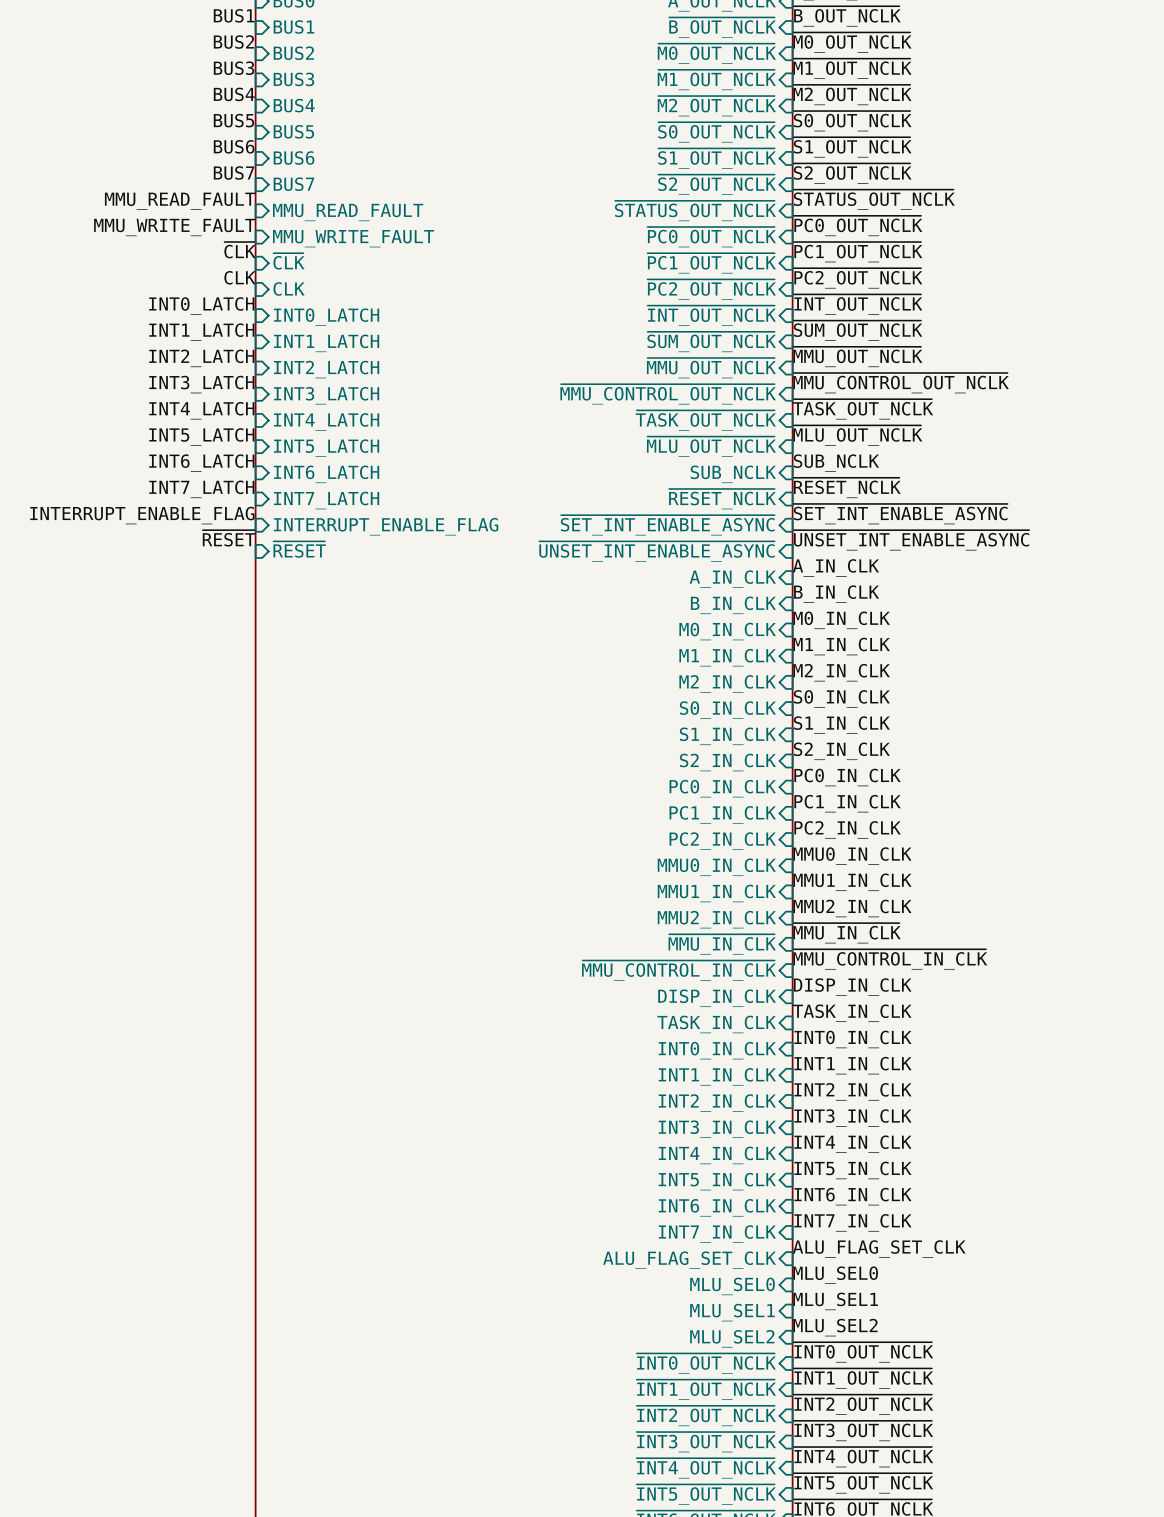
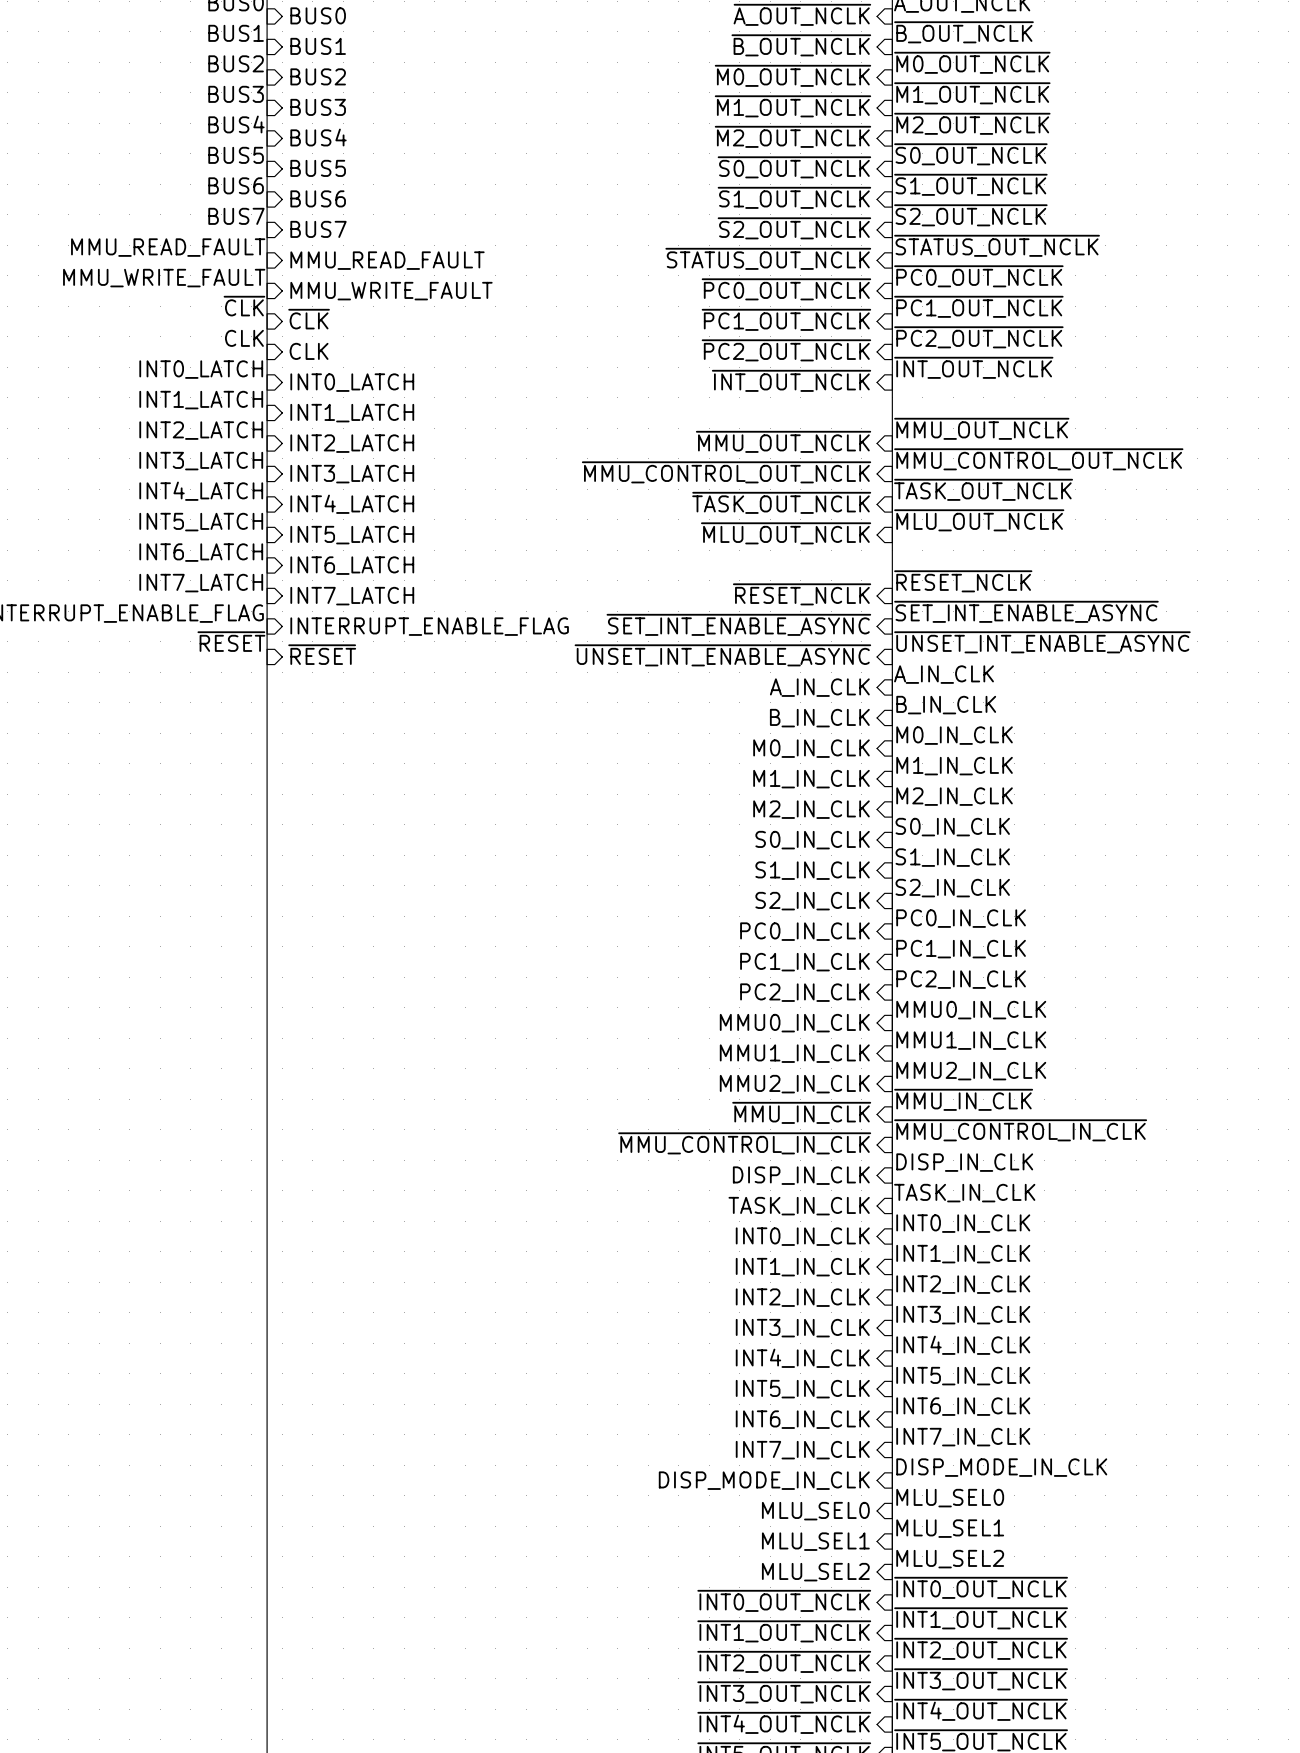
label: ~{SUM_OUT_NCLK} (858, 330) -> none
sheet pin: ~{SUM_OUT_NCLK} (711, 341) -> none
label: SUB_NCLK (836, 463) -> none
sheet pin: SUB_NCLK (733, 474) -> none
label: ALU_FLAG_SET_CLK (879, 1249) -> DISP_MODE_IN_CLK (1001, 1467)
sheet pin: ALU_FLAG_SET_CLK (689, 1260) -> DISP_MODE_IN_CLK (764, 1480)

